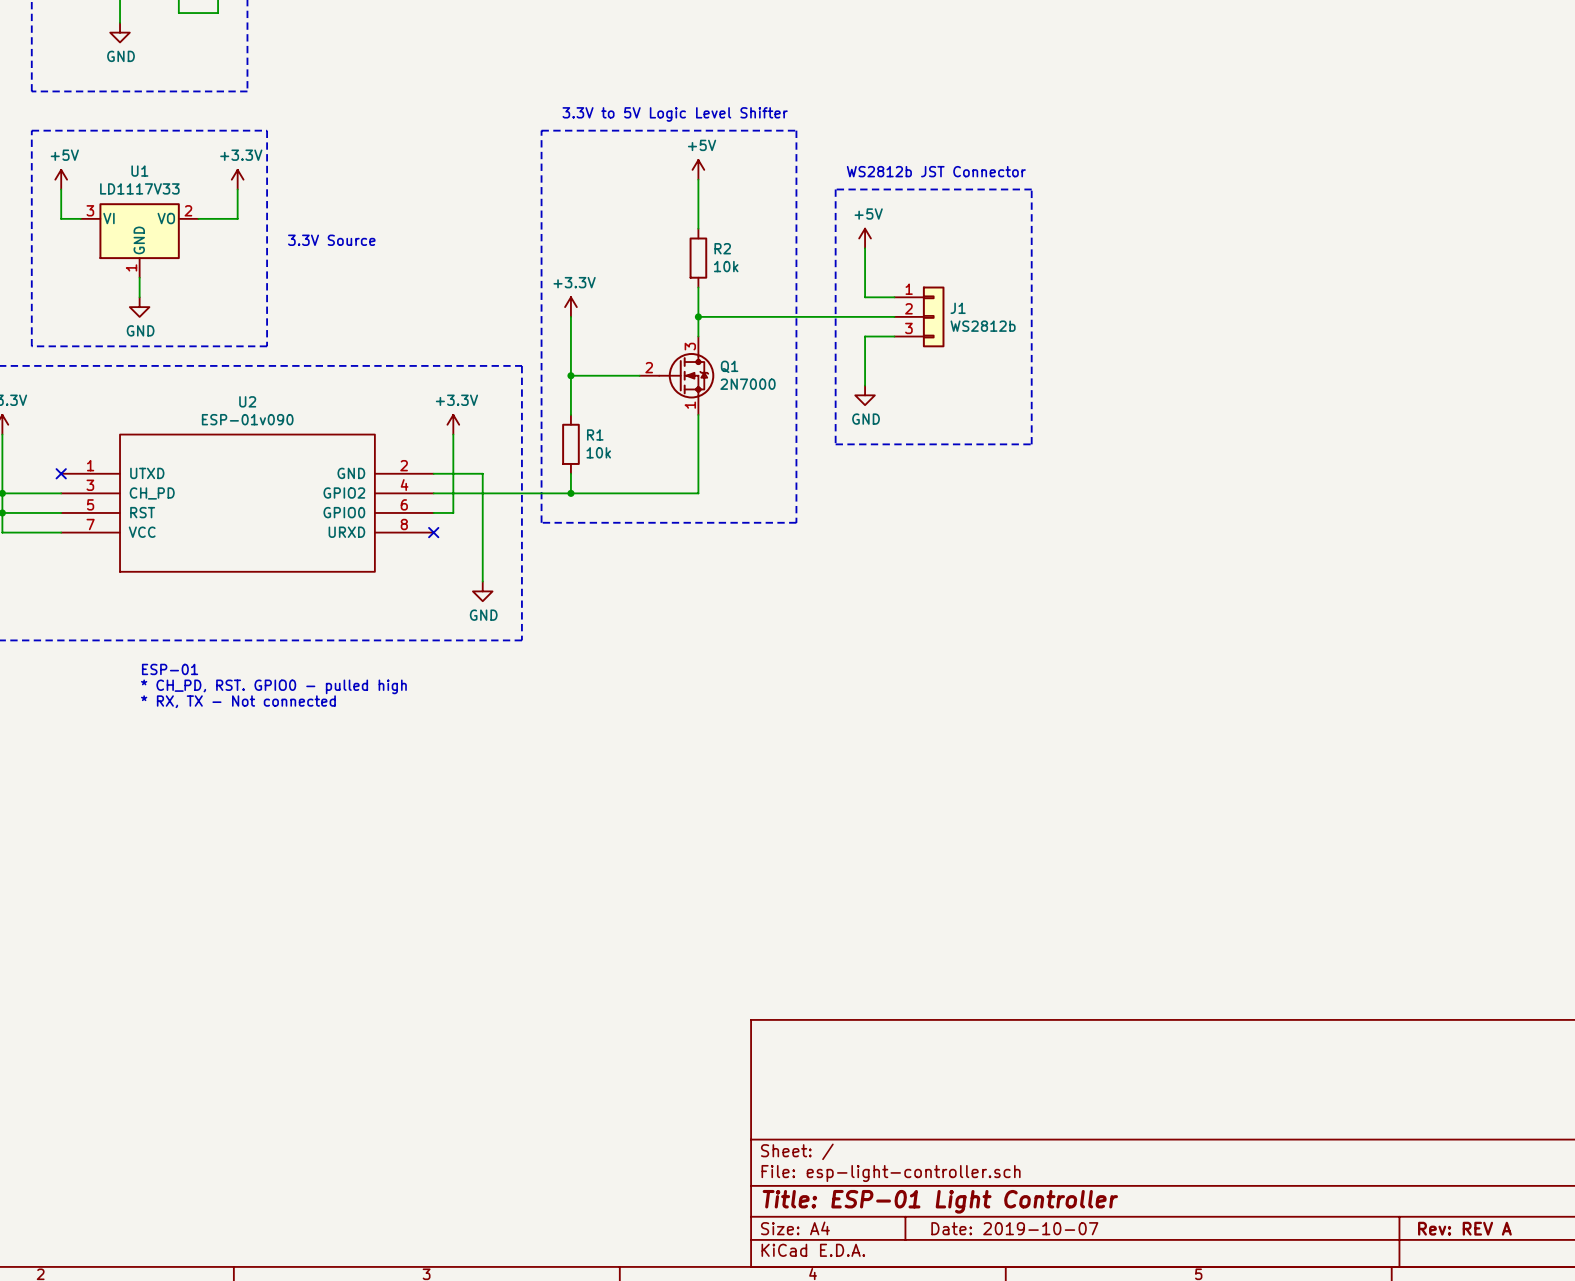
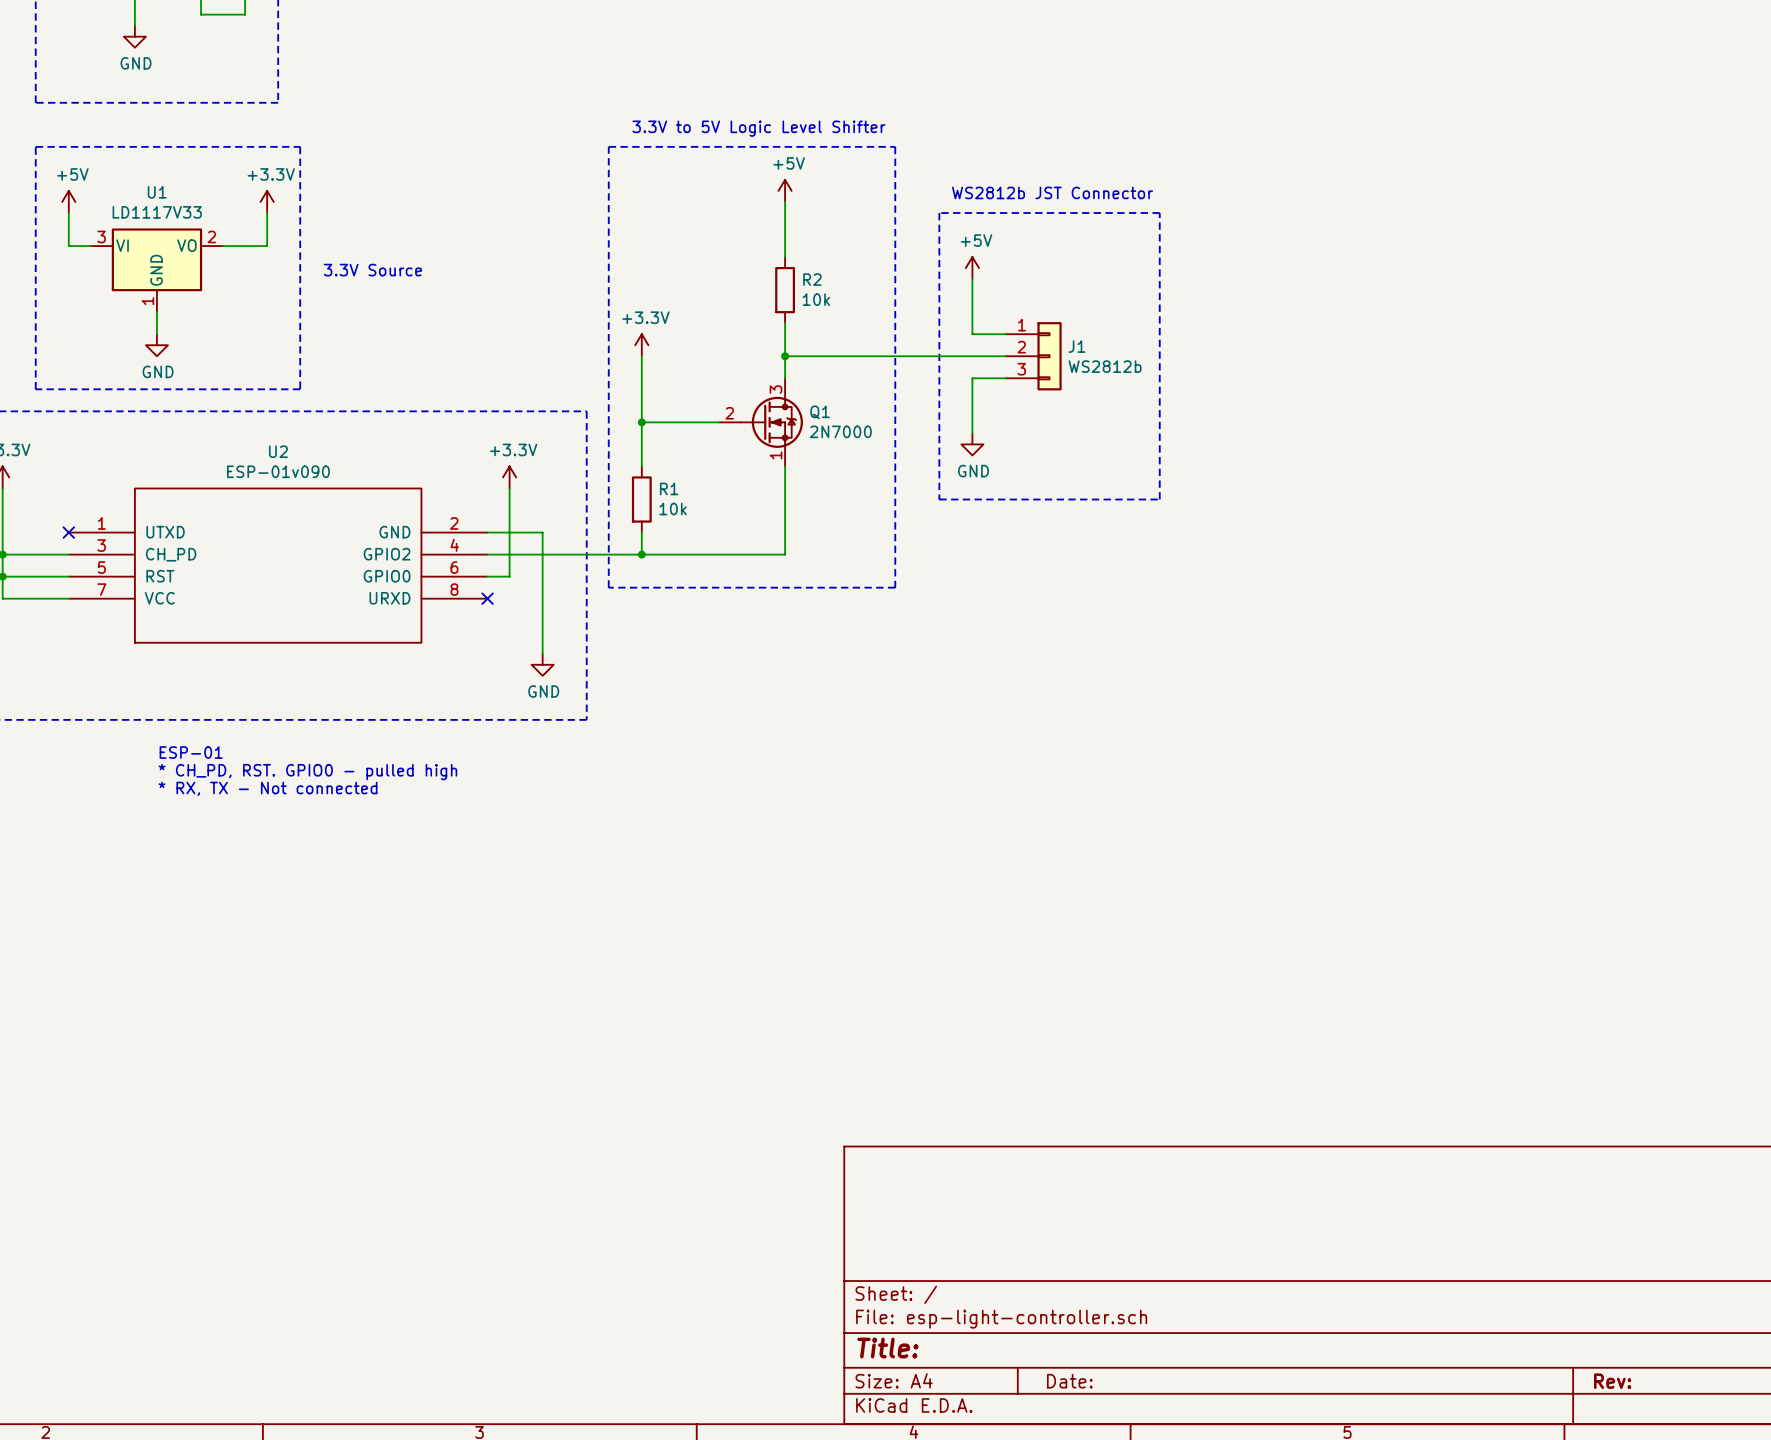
title block: Title: ESP-01 Light Controller (940, 1201) -> Title: (887, 1348)
title block: Date: 2019-10-07 (1014, 1228) -> Date: (1069, 1381)
title block: Rev: REV A (1464, 1228) -> Rev: (1612, 1381)

